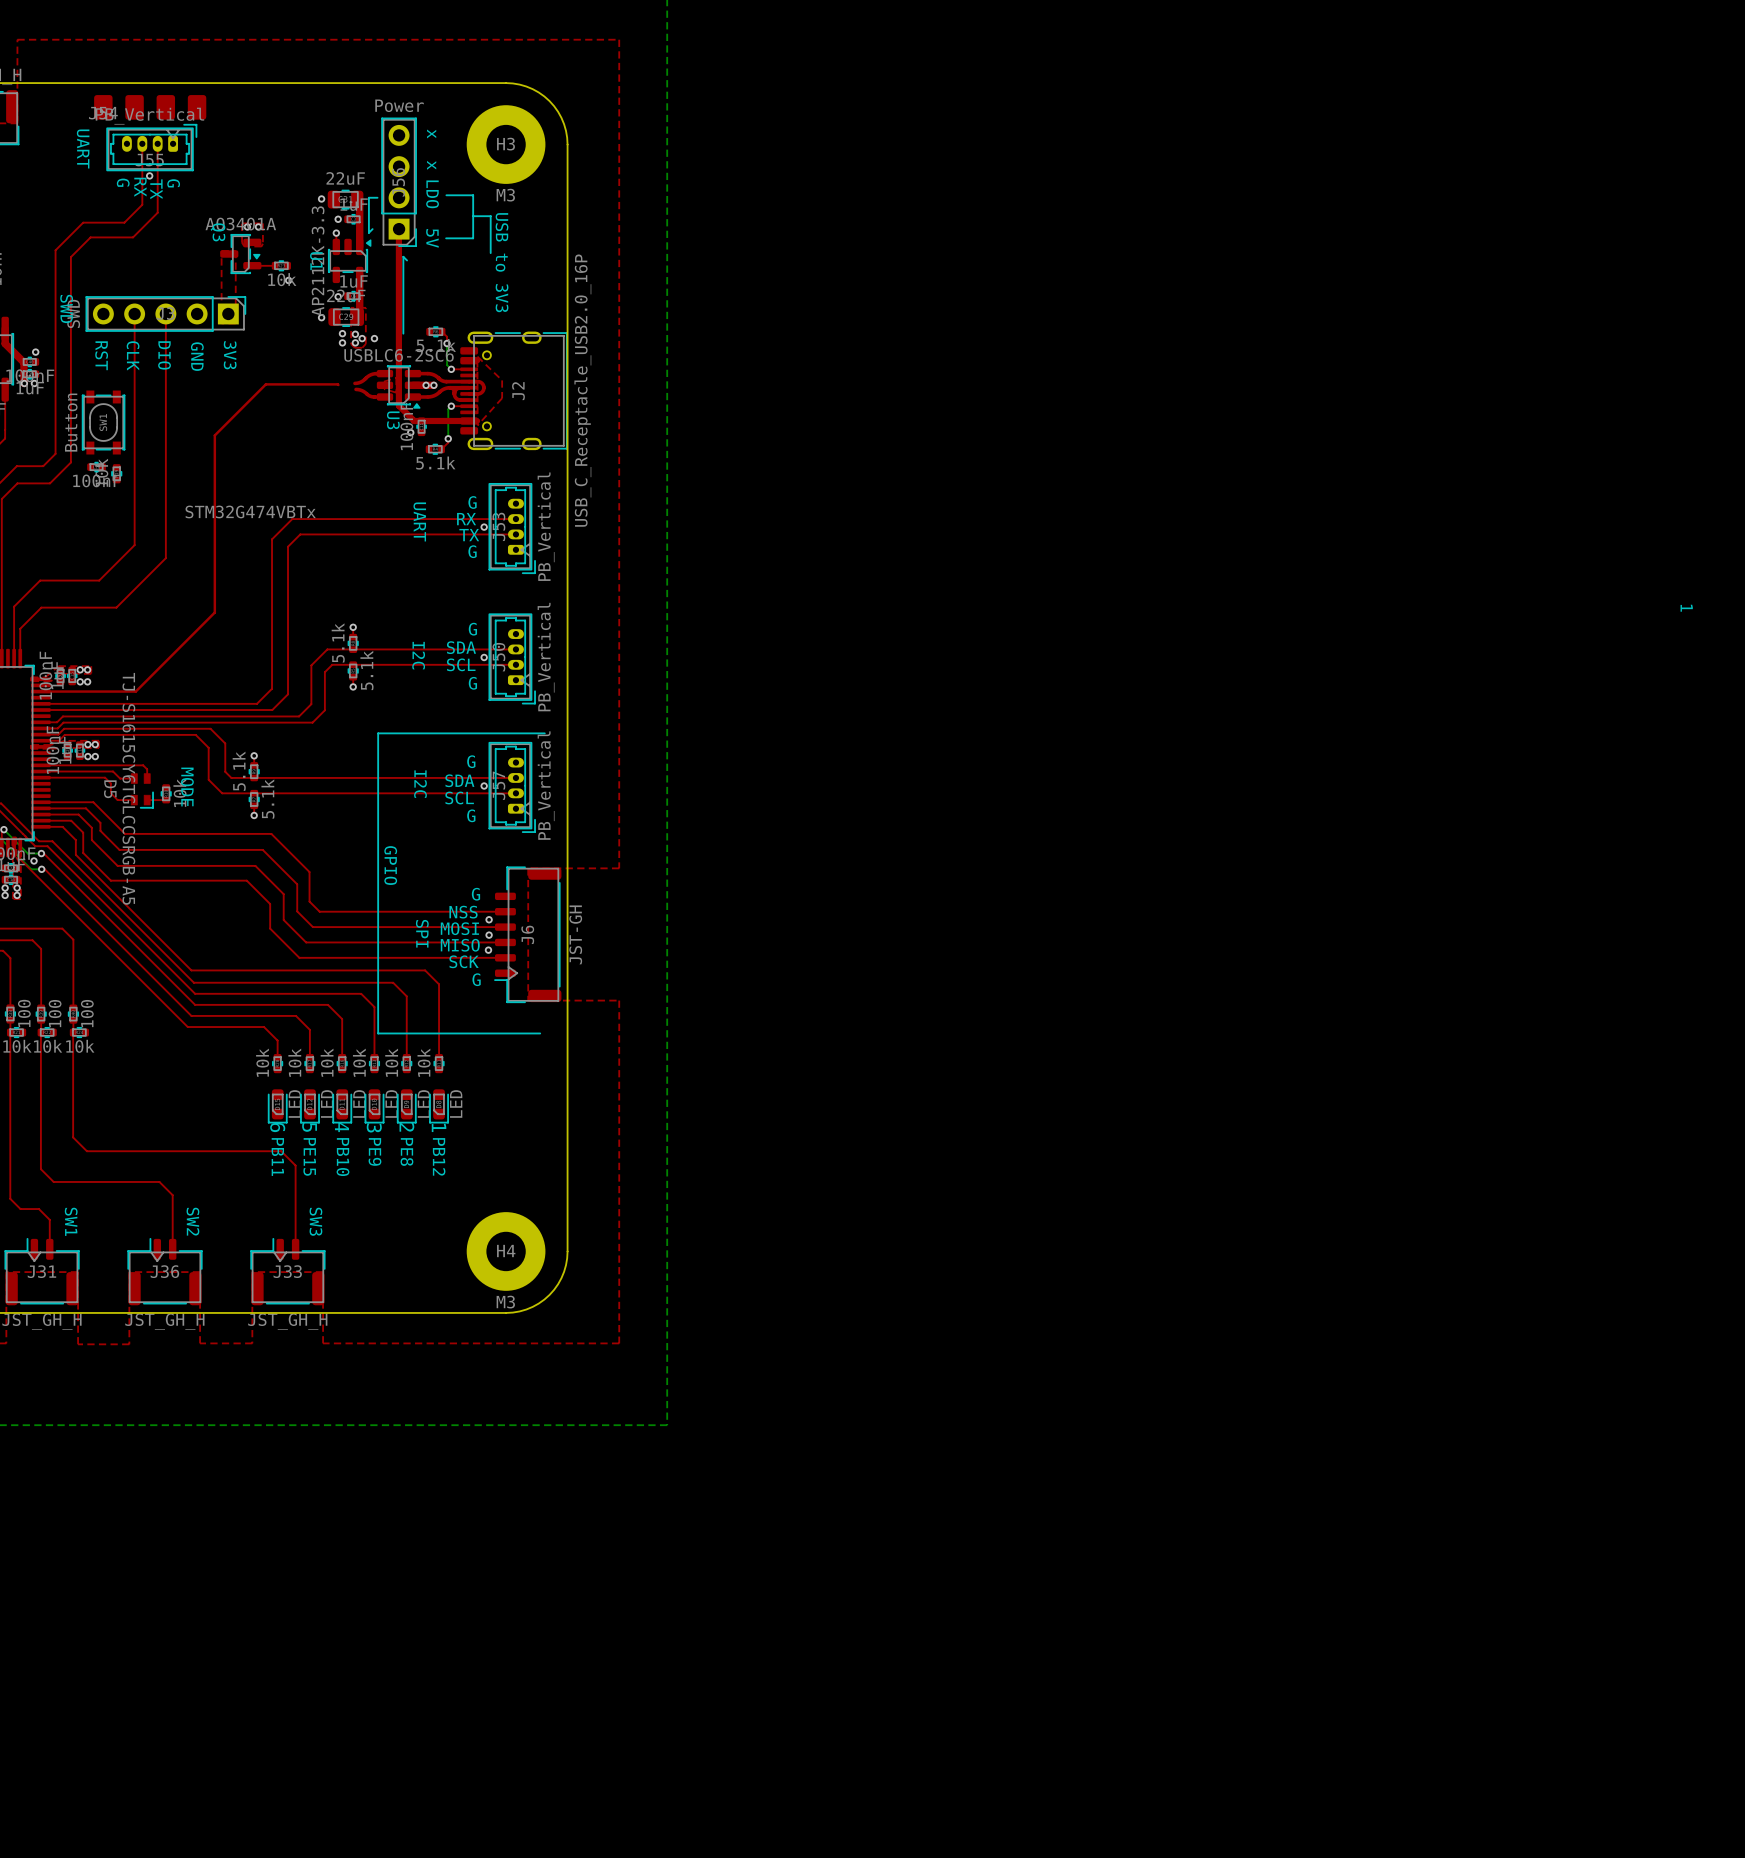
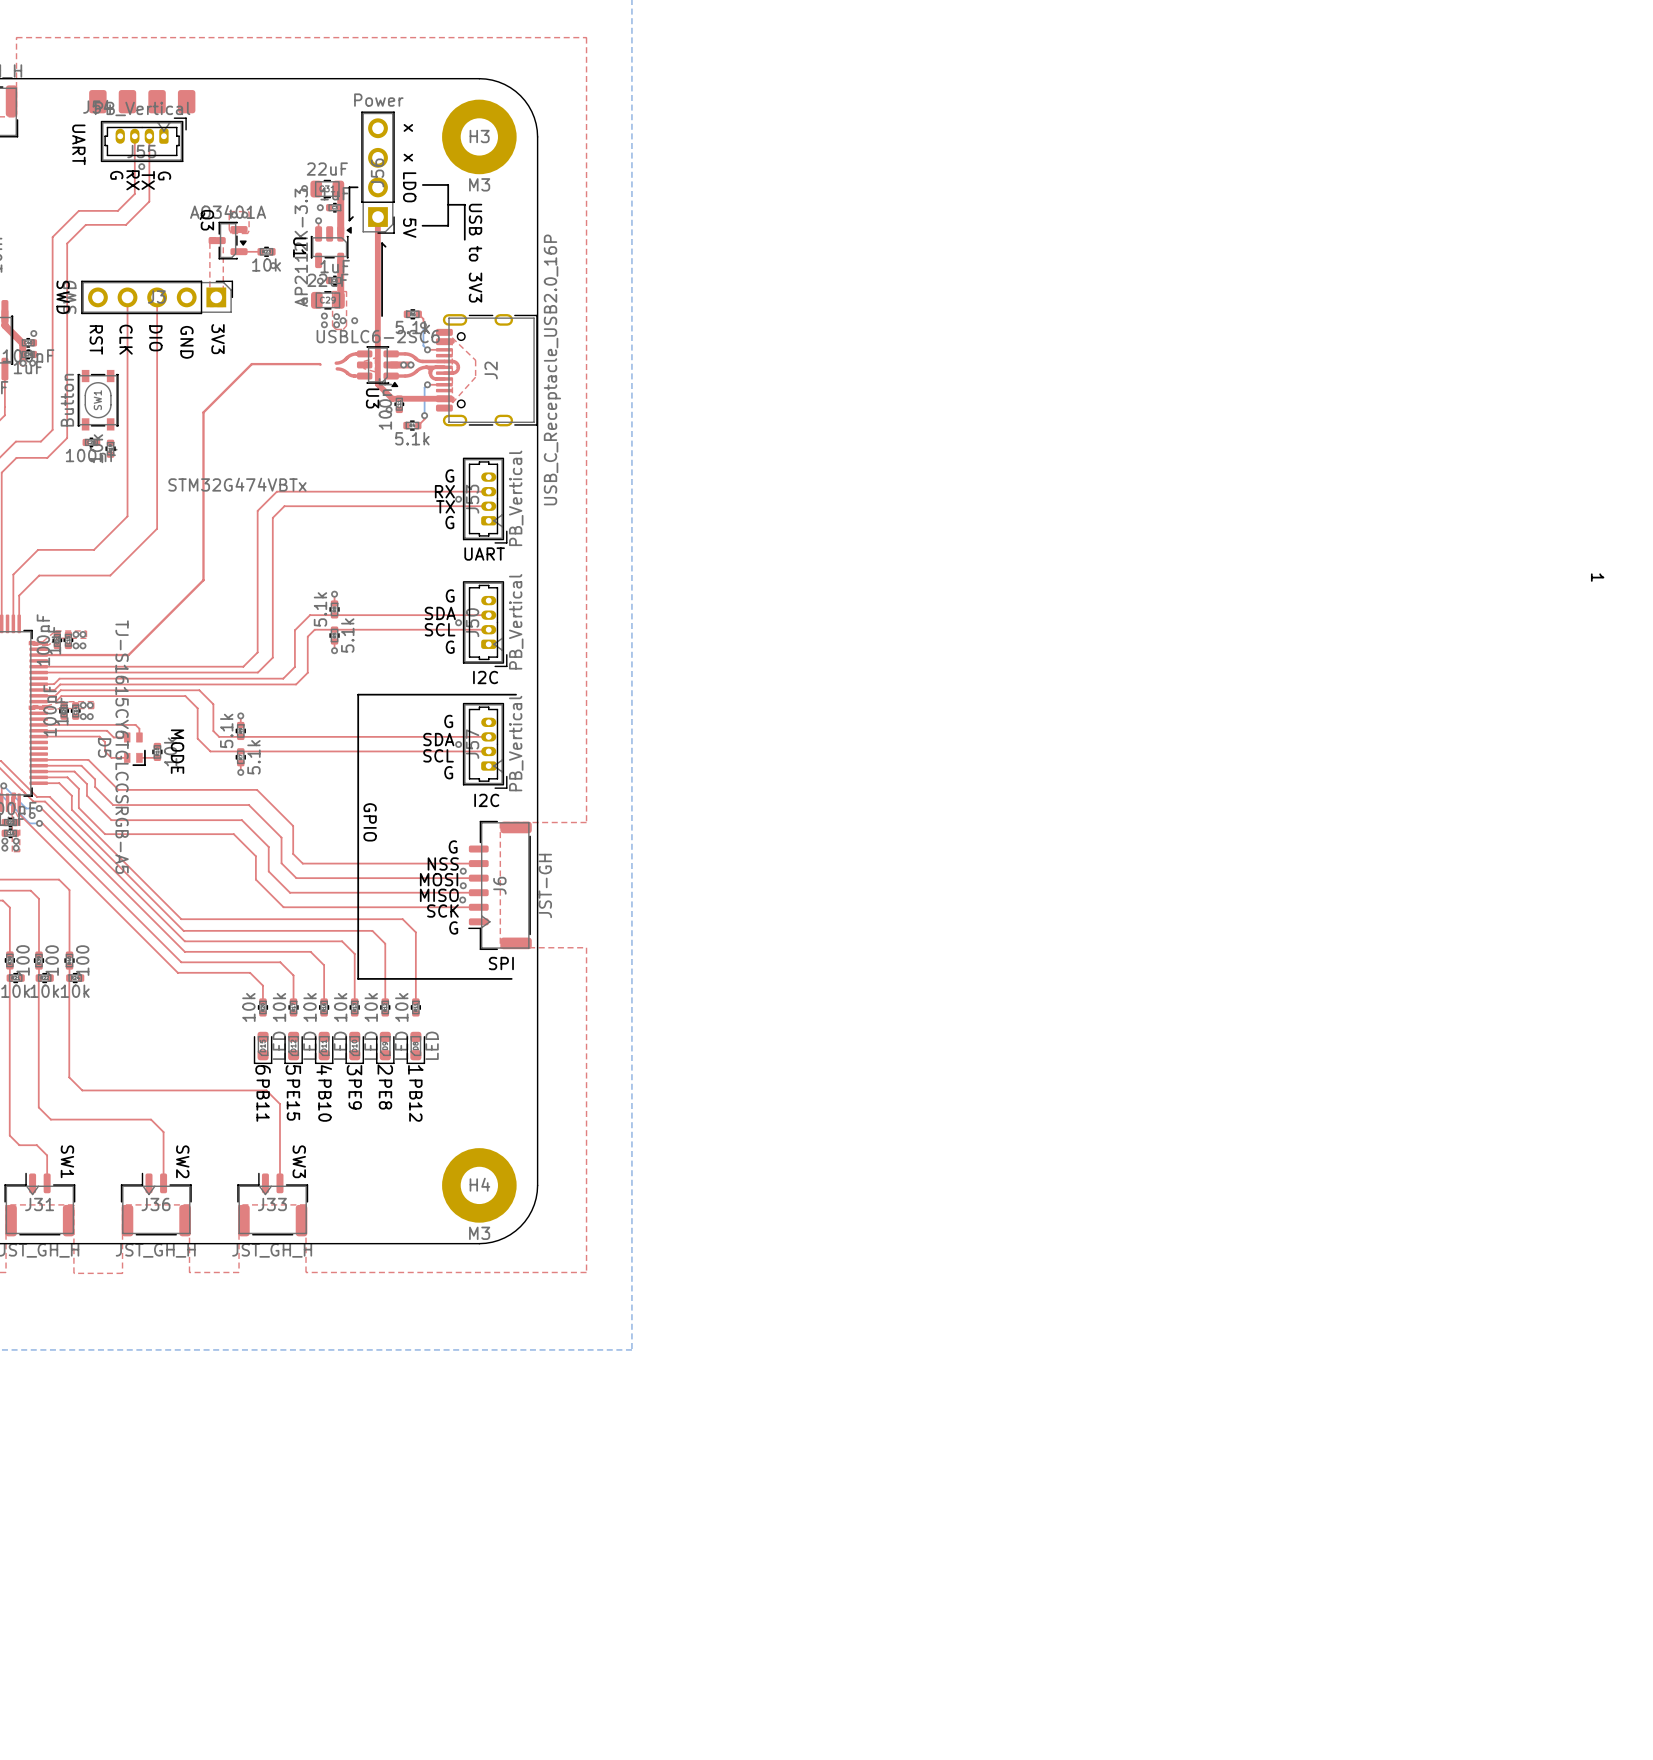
text rotation: 0° (419, 521) -> 90° counterclockwise (484, 554)
text position: UART (419, 521) -> UART (484, 554)
text: I2C (418, 655) -> none
text: none -> I2C (485, 677)
text: I2C (420, 784) -> none
text: none -> I2C (486, 800)
text rotation: 0° (422, 933) -> 90° counterclockwise (501, 963)
text position: SPI (422, 933) -> SPI (501, 963)

